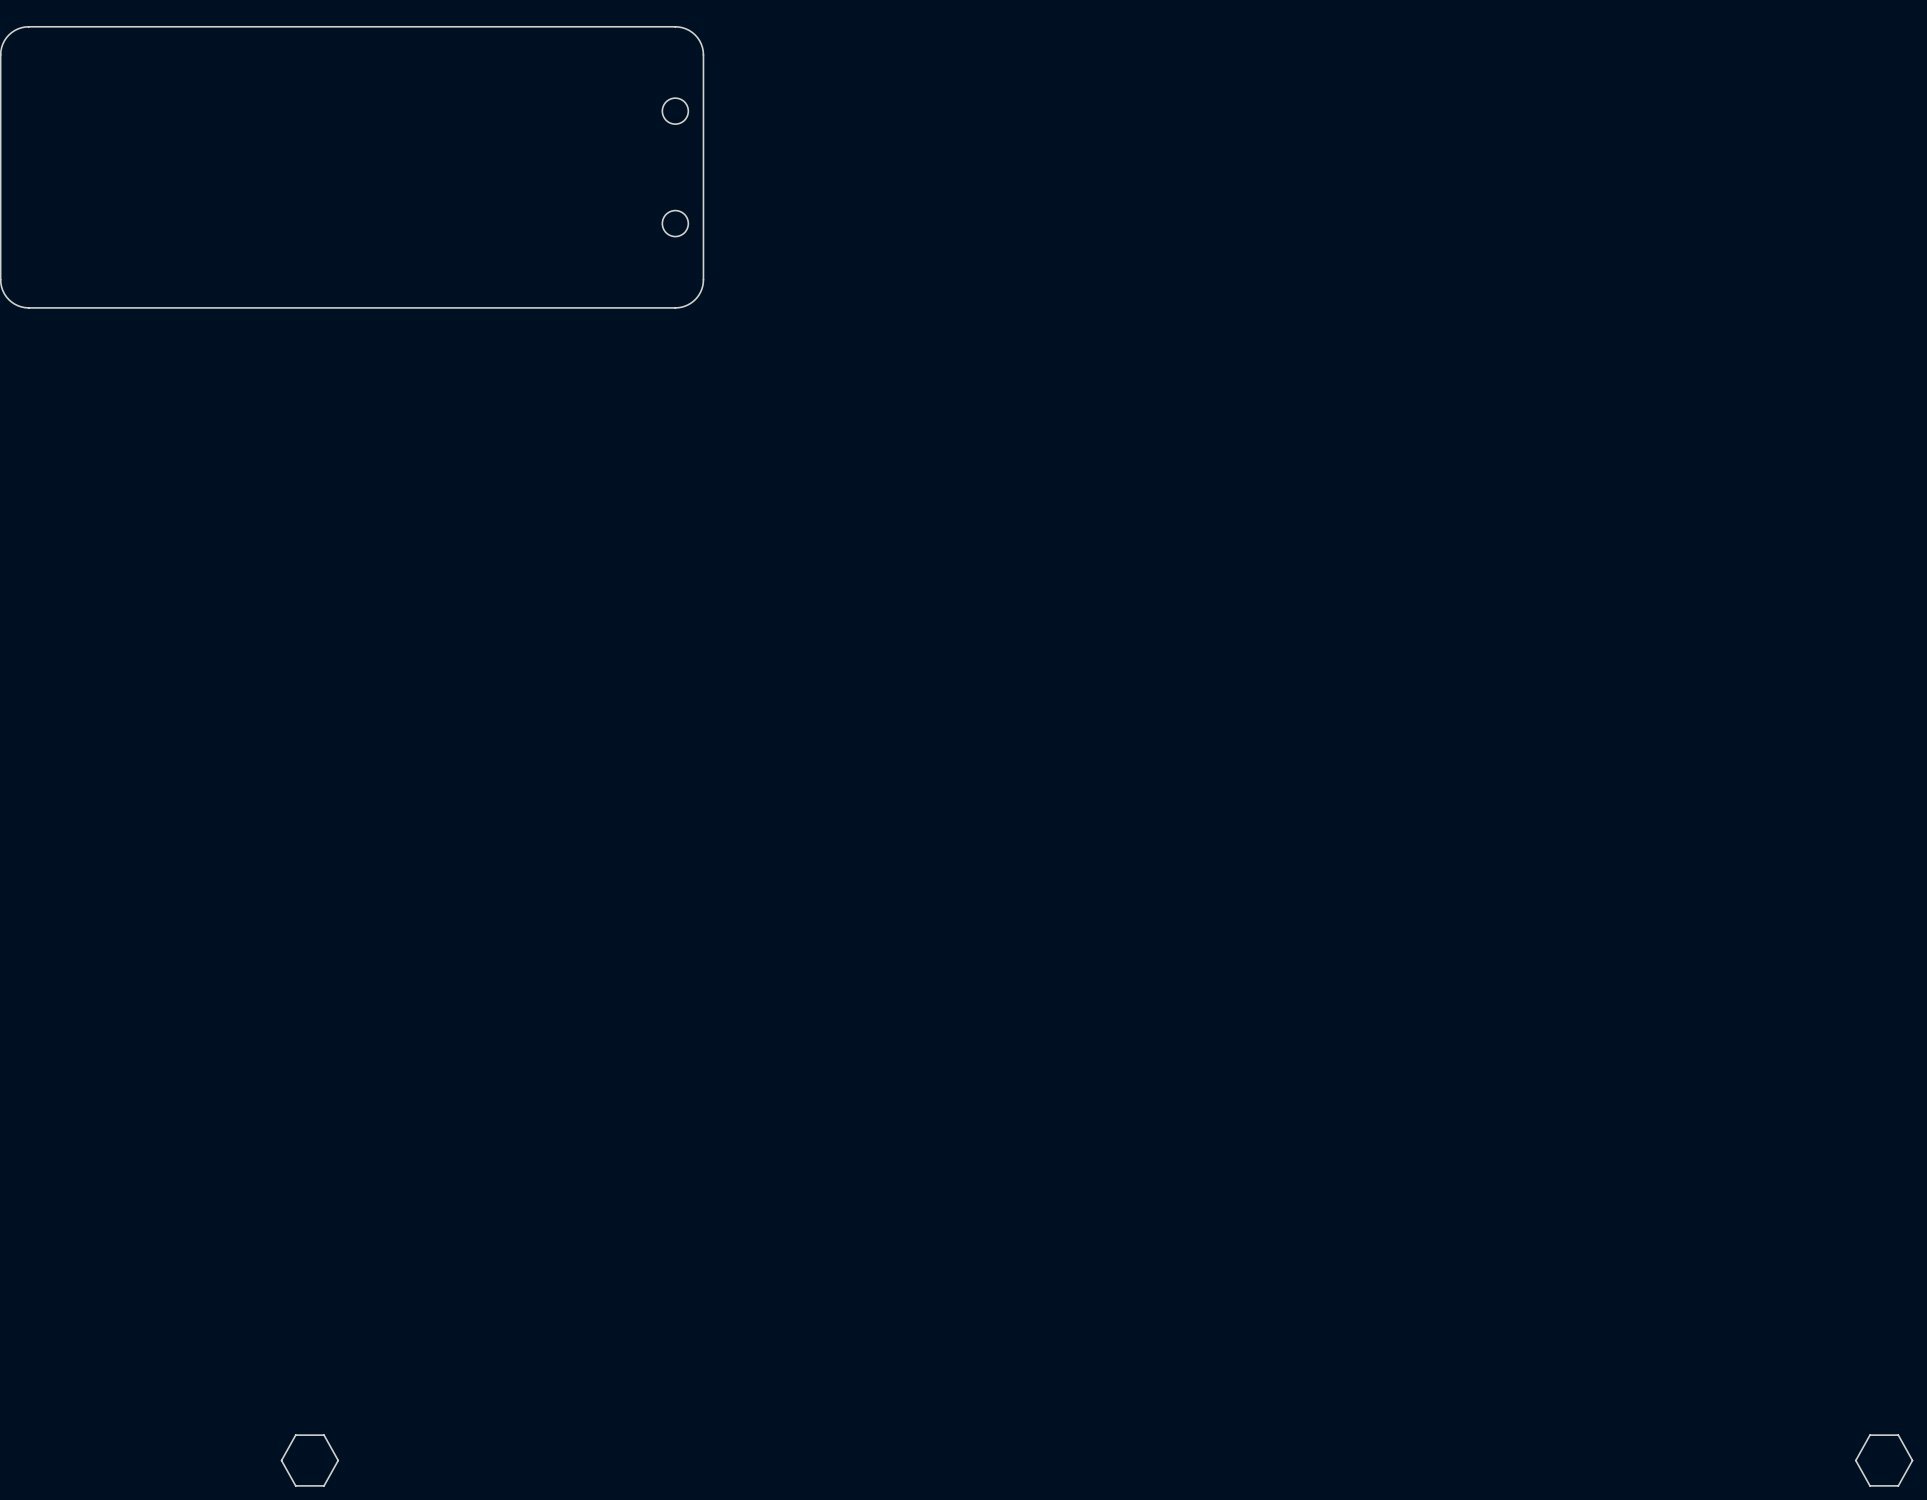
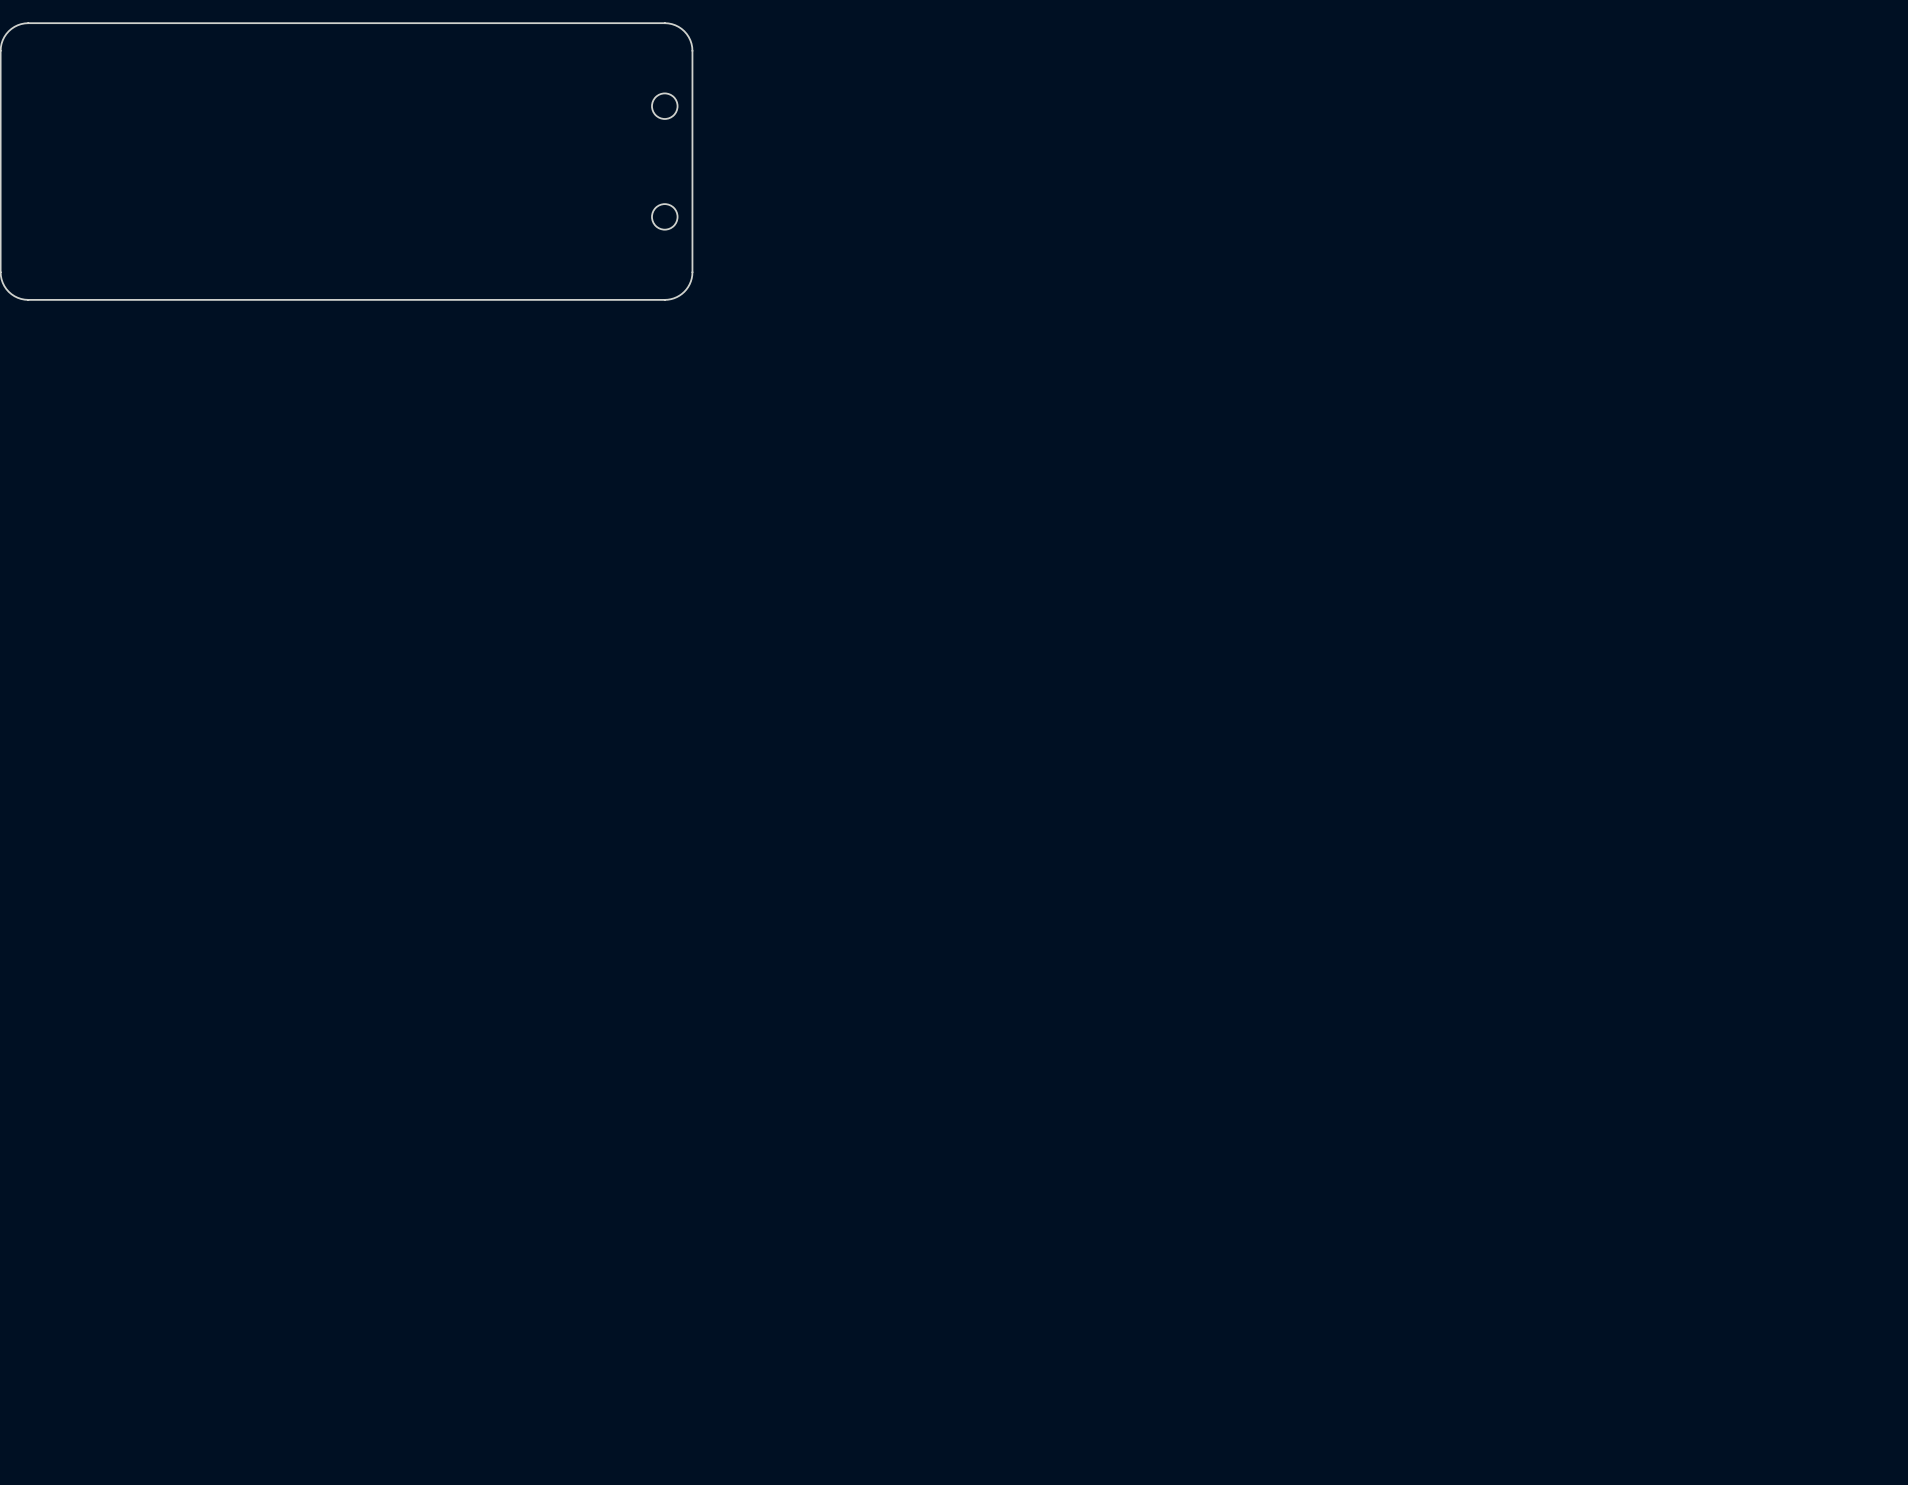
drawing: [280, 1434, 339, 1487] -> none
drawing: [1855, 1434, 1914, 1487] -> none

